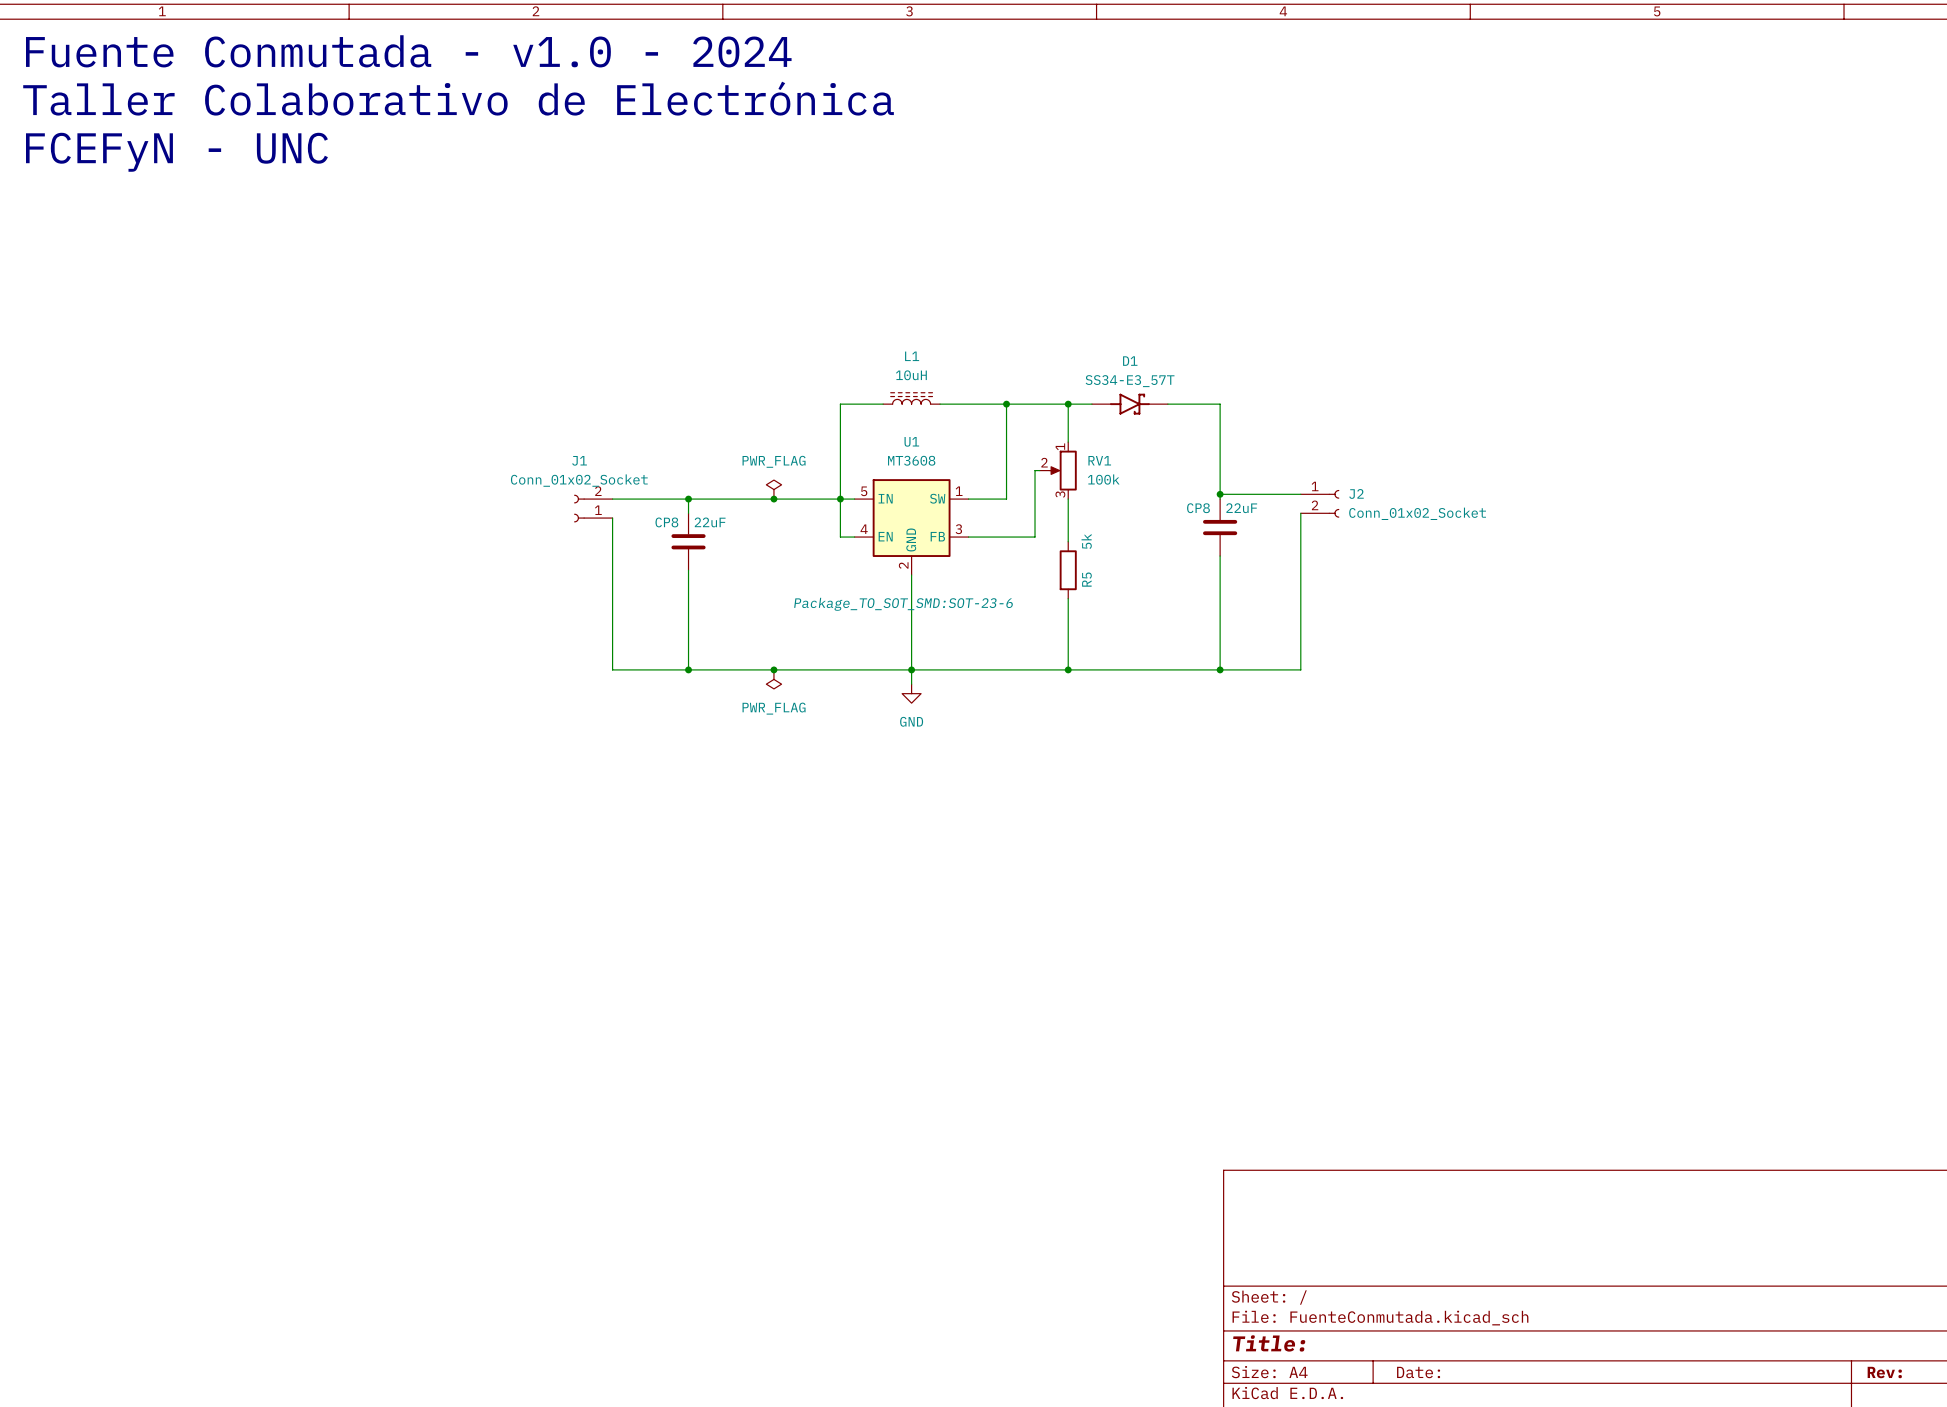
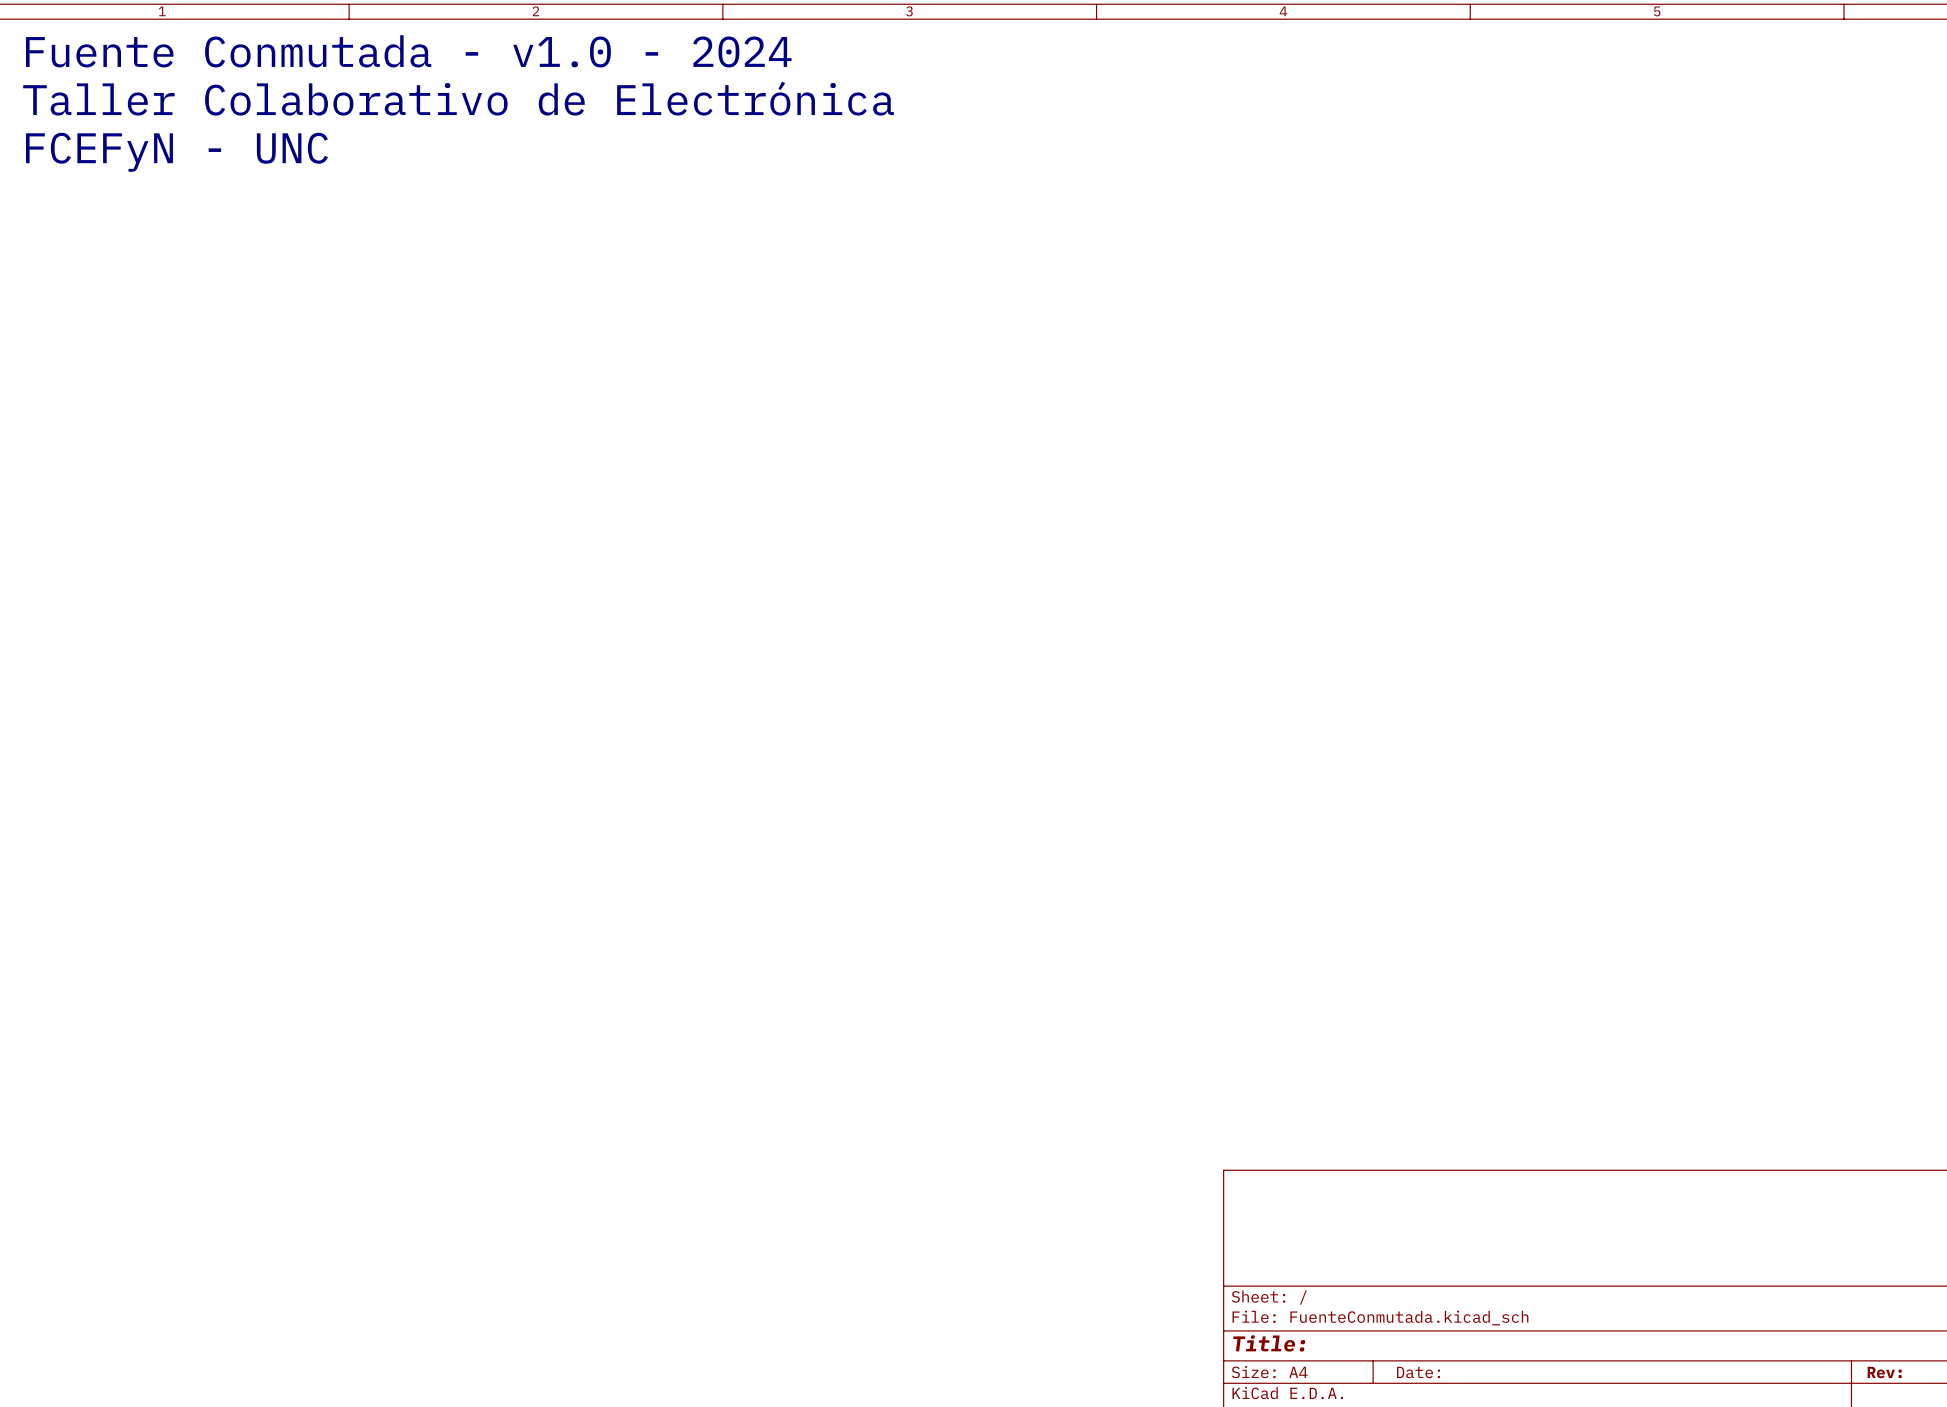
L1: 10uH (911, 398) -> none
wire: (883, 404) (840, 404) (840, 537) (854, 537) -> none
wire: (940, 404) (1091, 404) -> none
wire: (1006, 404) (1006, 499) (968, 499) -> none
junction: (1006, 404) -> none
wire: (1068, 404) (1068, 442) -> none
junction: (1068, 404) -> none
D1: SS34-E3_57T (1129, 404) -> none
wire: (1167, 404) (1220, 404) (1220, 499) -> none
wire: (1039, 470) (1035, 470) (1035, 537) (968, 537) -> none
RV1: 100k (1058, 470) -> none
power symbol: PWR_FLAG (773, 489) -> none
wire: (1220, 494) (1300, 494) -> none
junction: (1220, 494) -> none
wire: (612, 499) (854, 499) -> none
wire: (688, 499) (688, 513) -> none
junction: (688, 499) -> none
junction: (773, 499) -> none
junction: (840, 499) -> none
wire: (1068, 499) (1068, 541) -> none
J2: Conn_01x02_Socket (1320, 503) -> none
J1: Conn_01x02_Socket (593, 508) -> none
wire: (1300, 513) (1300, 669) (612, 669) (612, 518) -> none
U1: MT3608 (911, 527) -> none
CP8: 22uF (1220, 527) -> none
CP8: 22uF (688, 541) -> none
wire: (1220, 556) (1220, 669) -> none
wire: (688, 570) (688, 669) -> none
R5: 5k (1068, 570) -> none
wire: (911, 575) (911, 684) -> none
wire: (1068, 598) (1068, 669) -> none
junction: (688, 669) -> none
junction: (773, 669) -> none
junction: (911, 669) -> none
junction: (1068, 669) -> none
junction: (1220, 669) -> none
power symbol: PWR_FLAG (773, 679) -> none
power symbol: GND (911, 693) -> none

